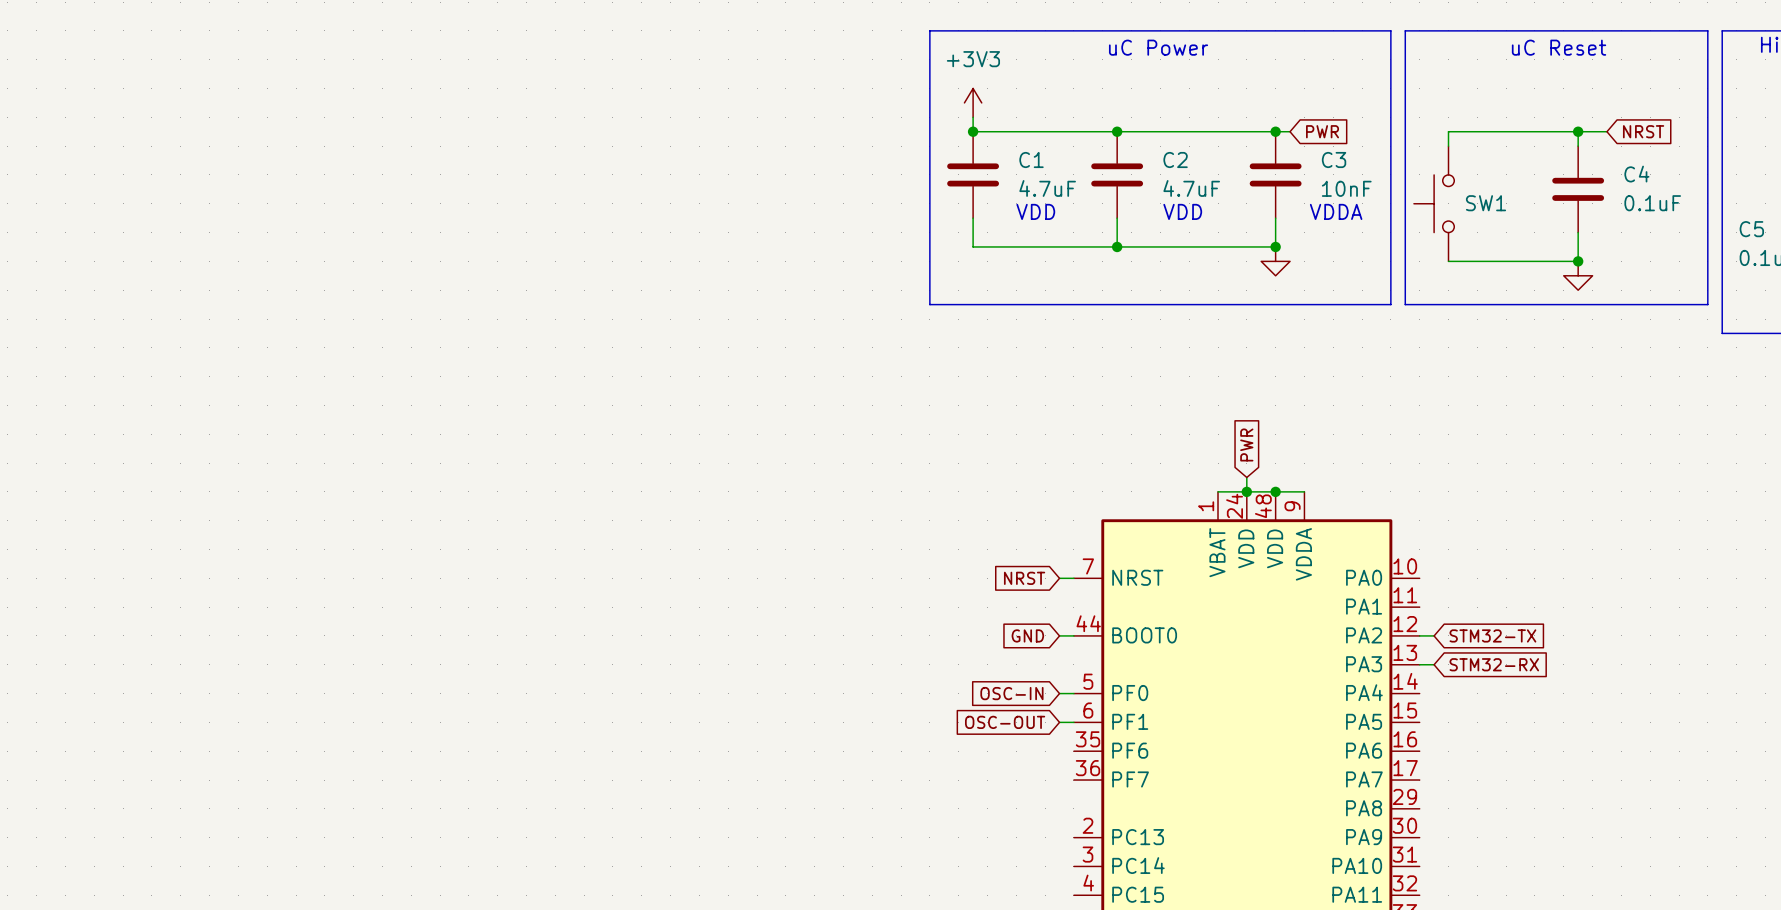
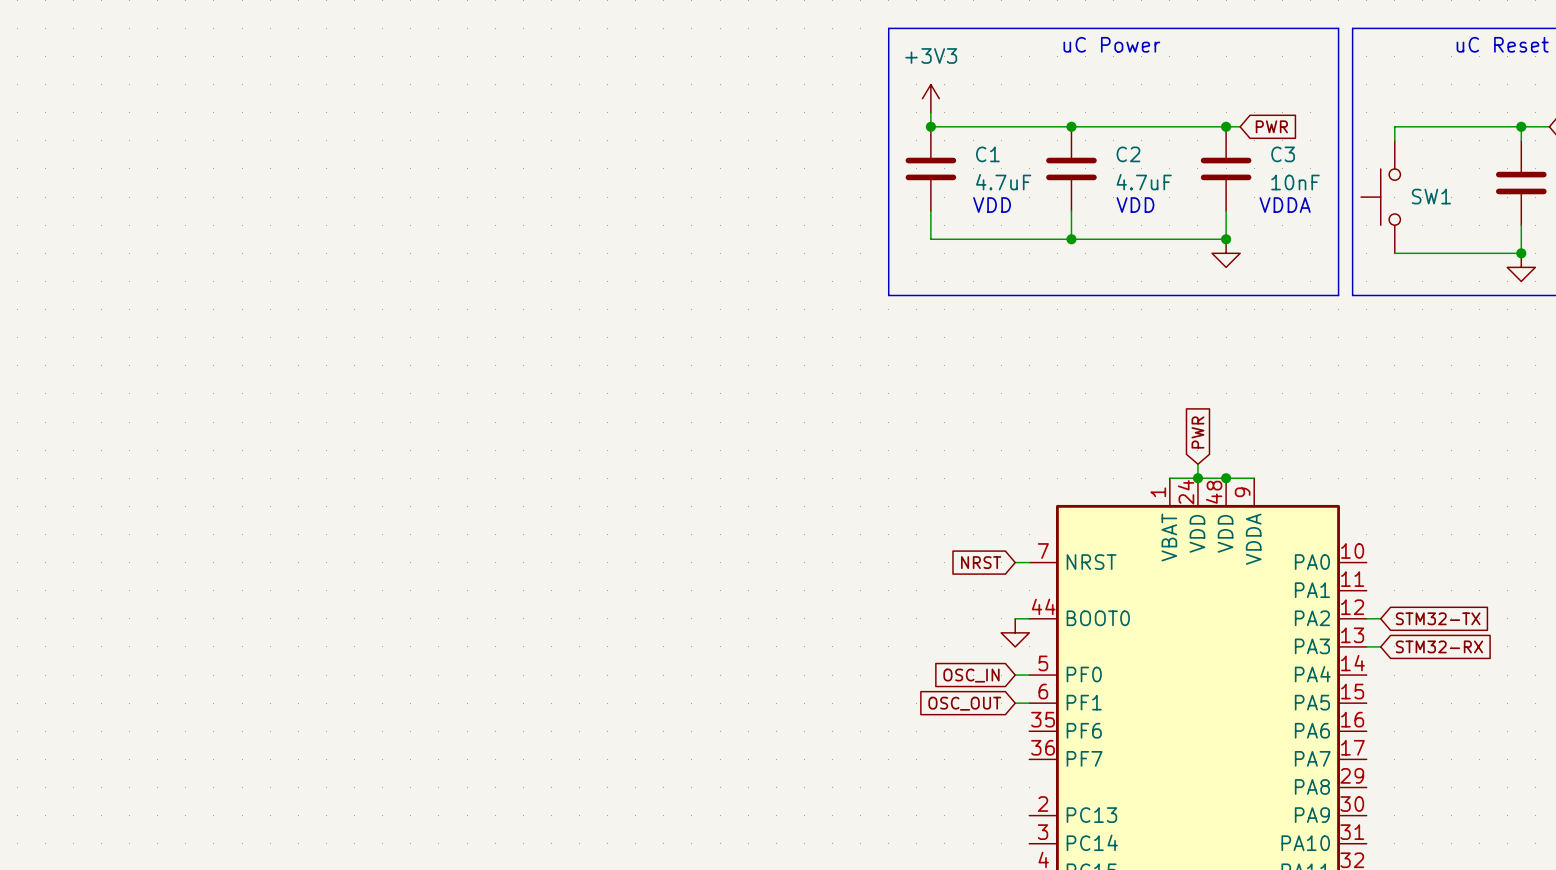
global label: GND (1027, 635) -> none
power symbol: none -> (1015, 632)
global label: OSC-IN (1011, 693) -> OSC_IN (971, 675)
global label: OSC-OUT (1005, 722) -> OSC_OUT (964, 703)

